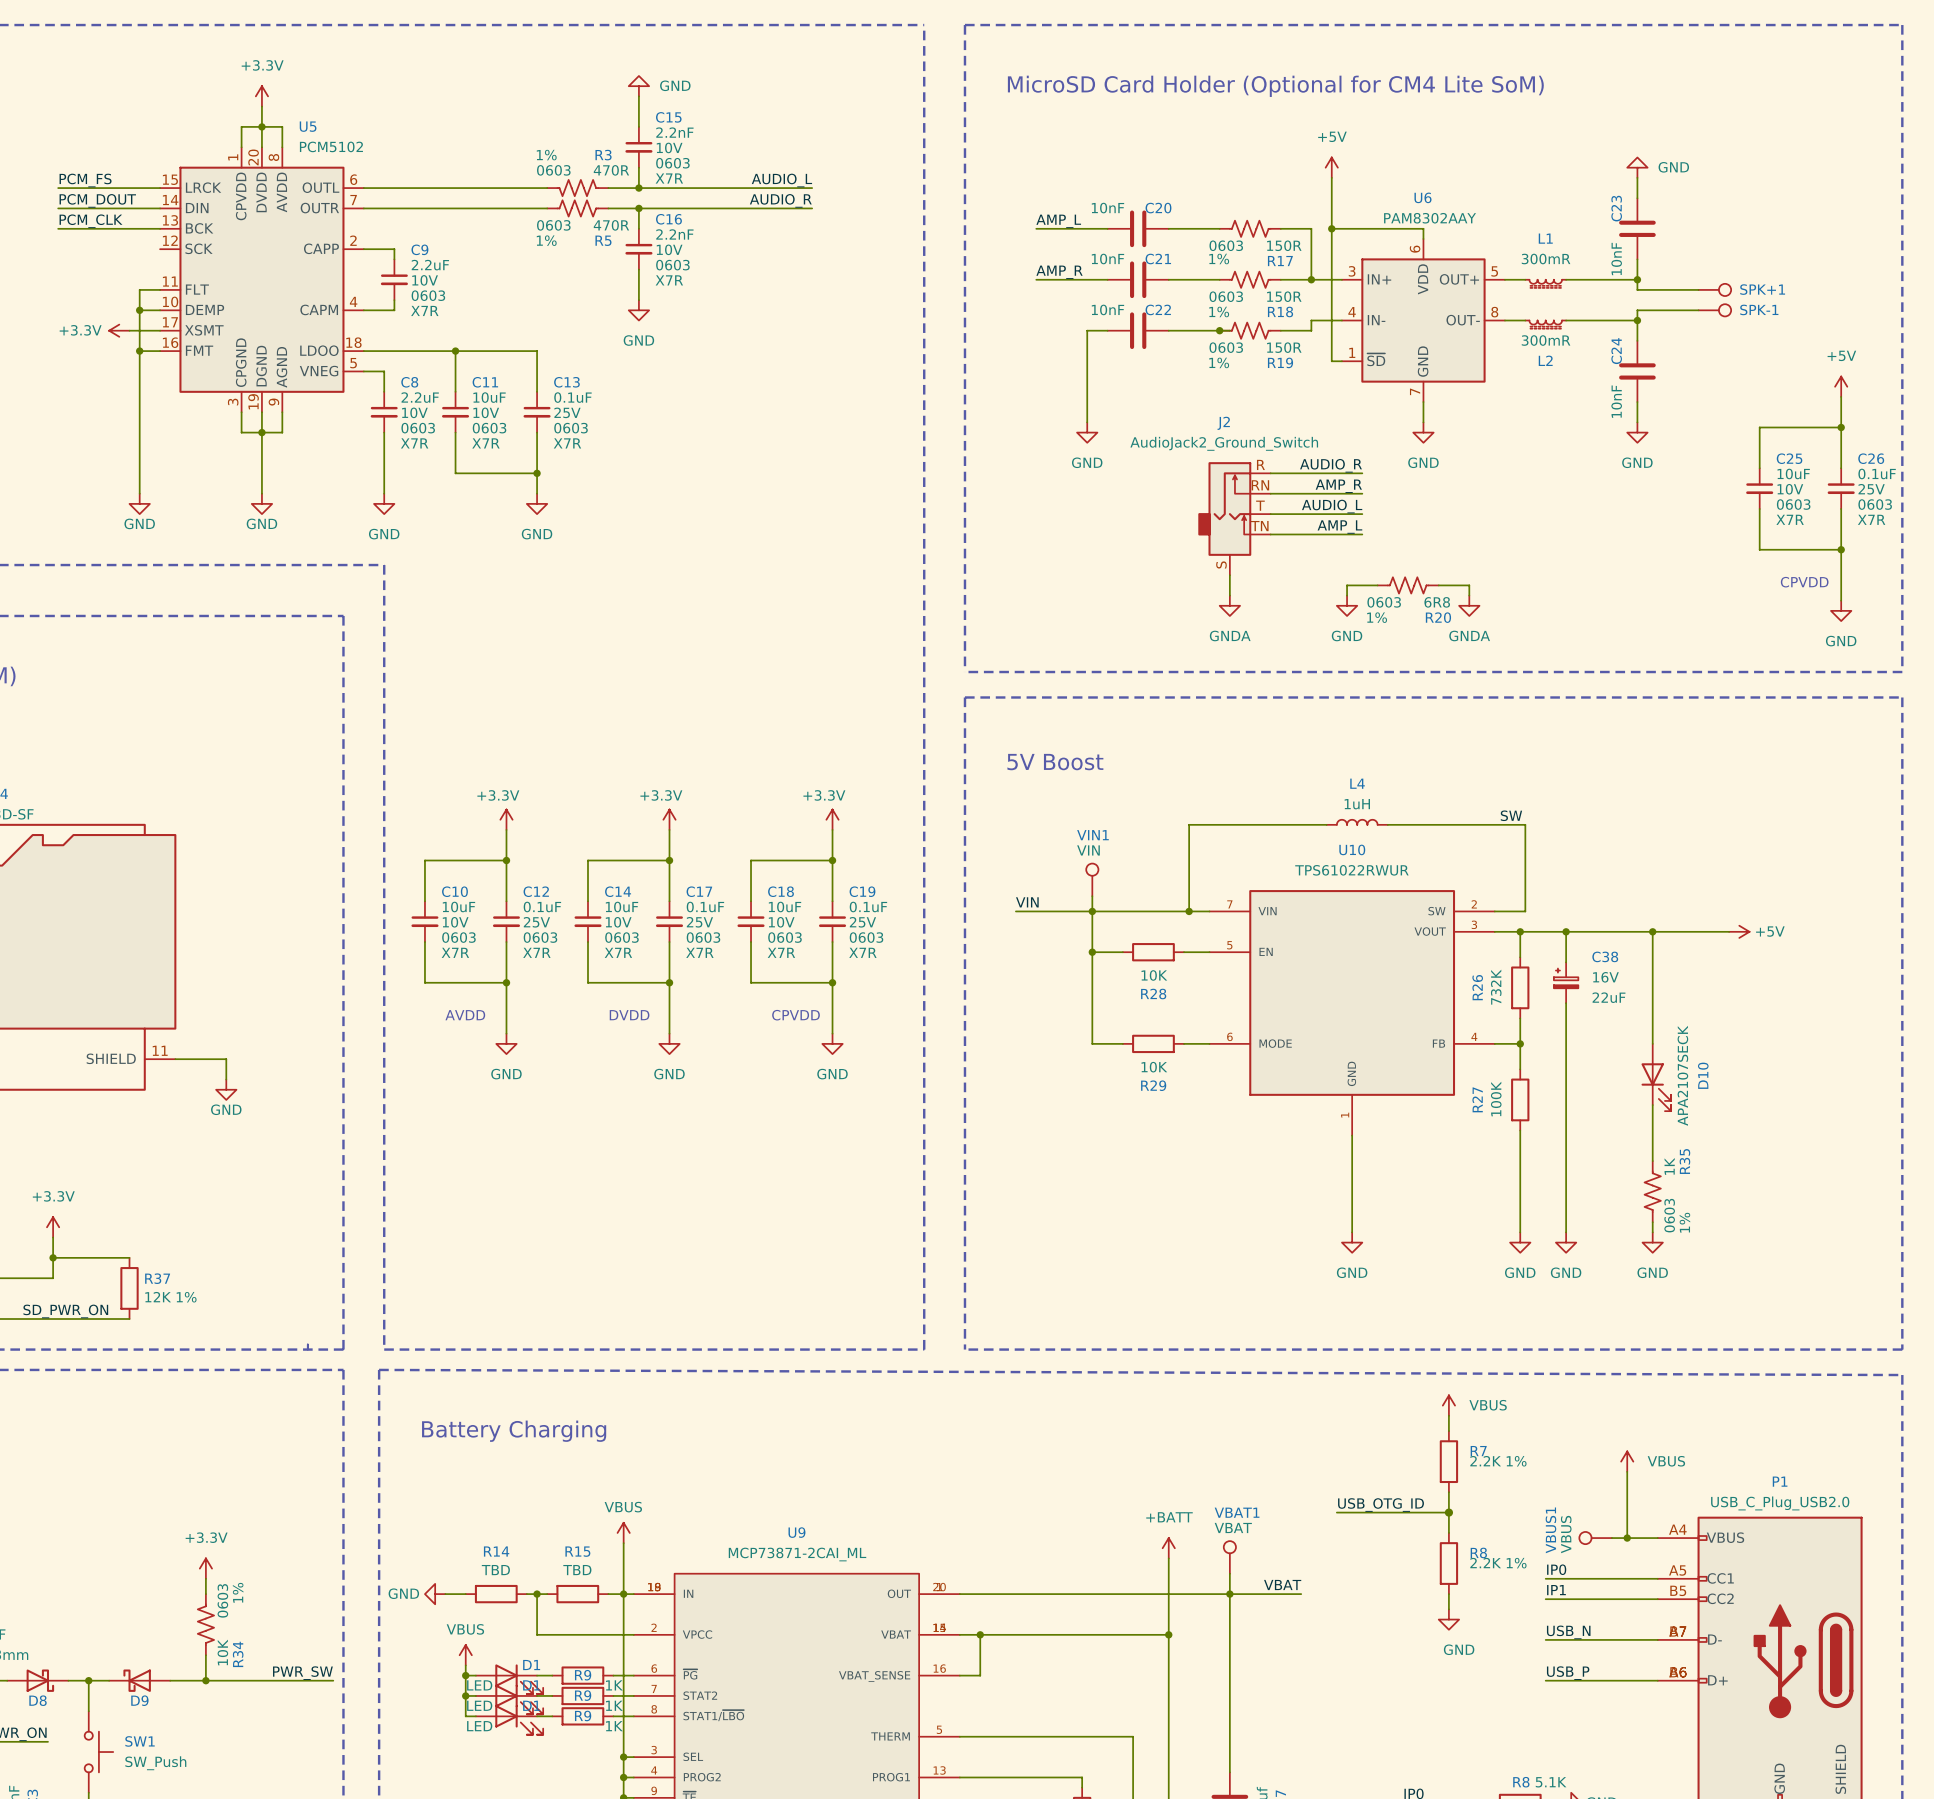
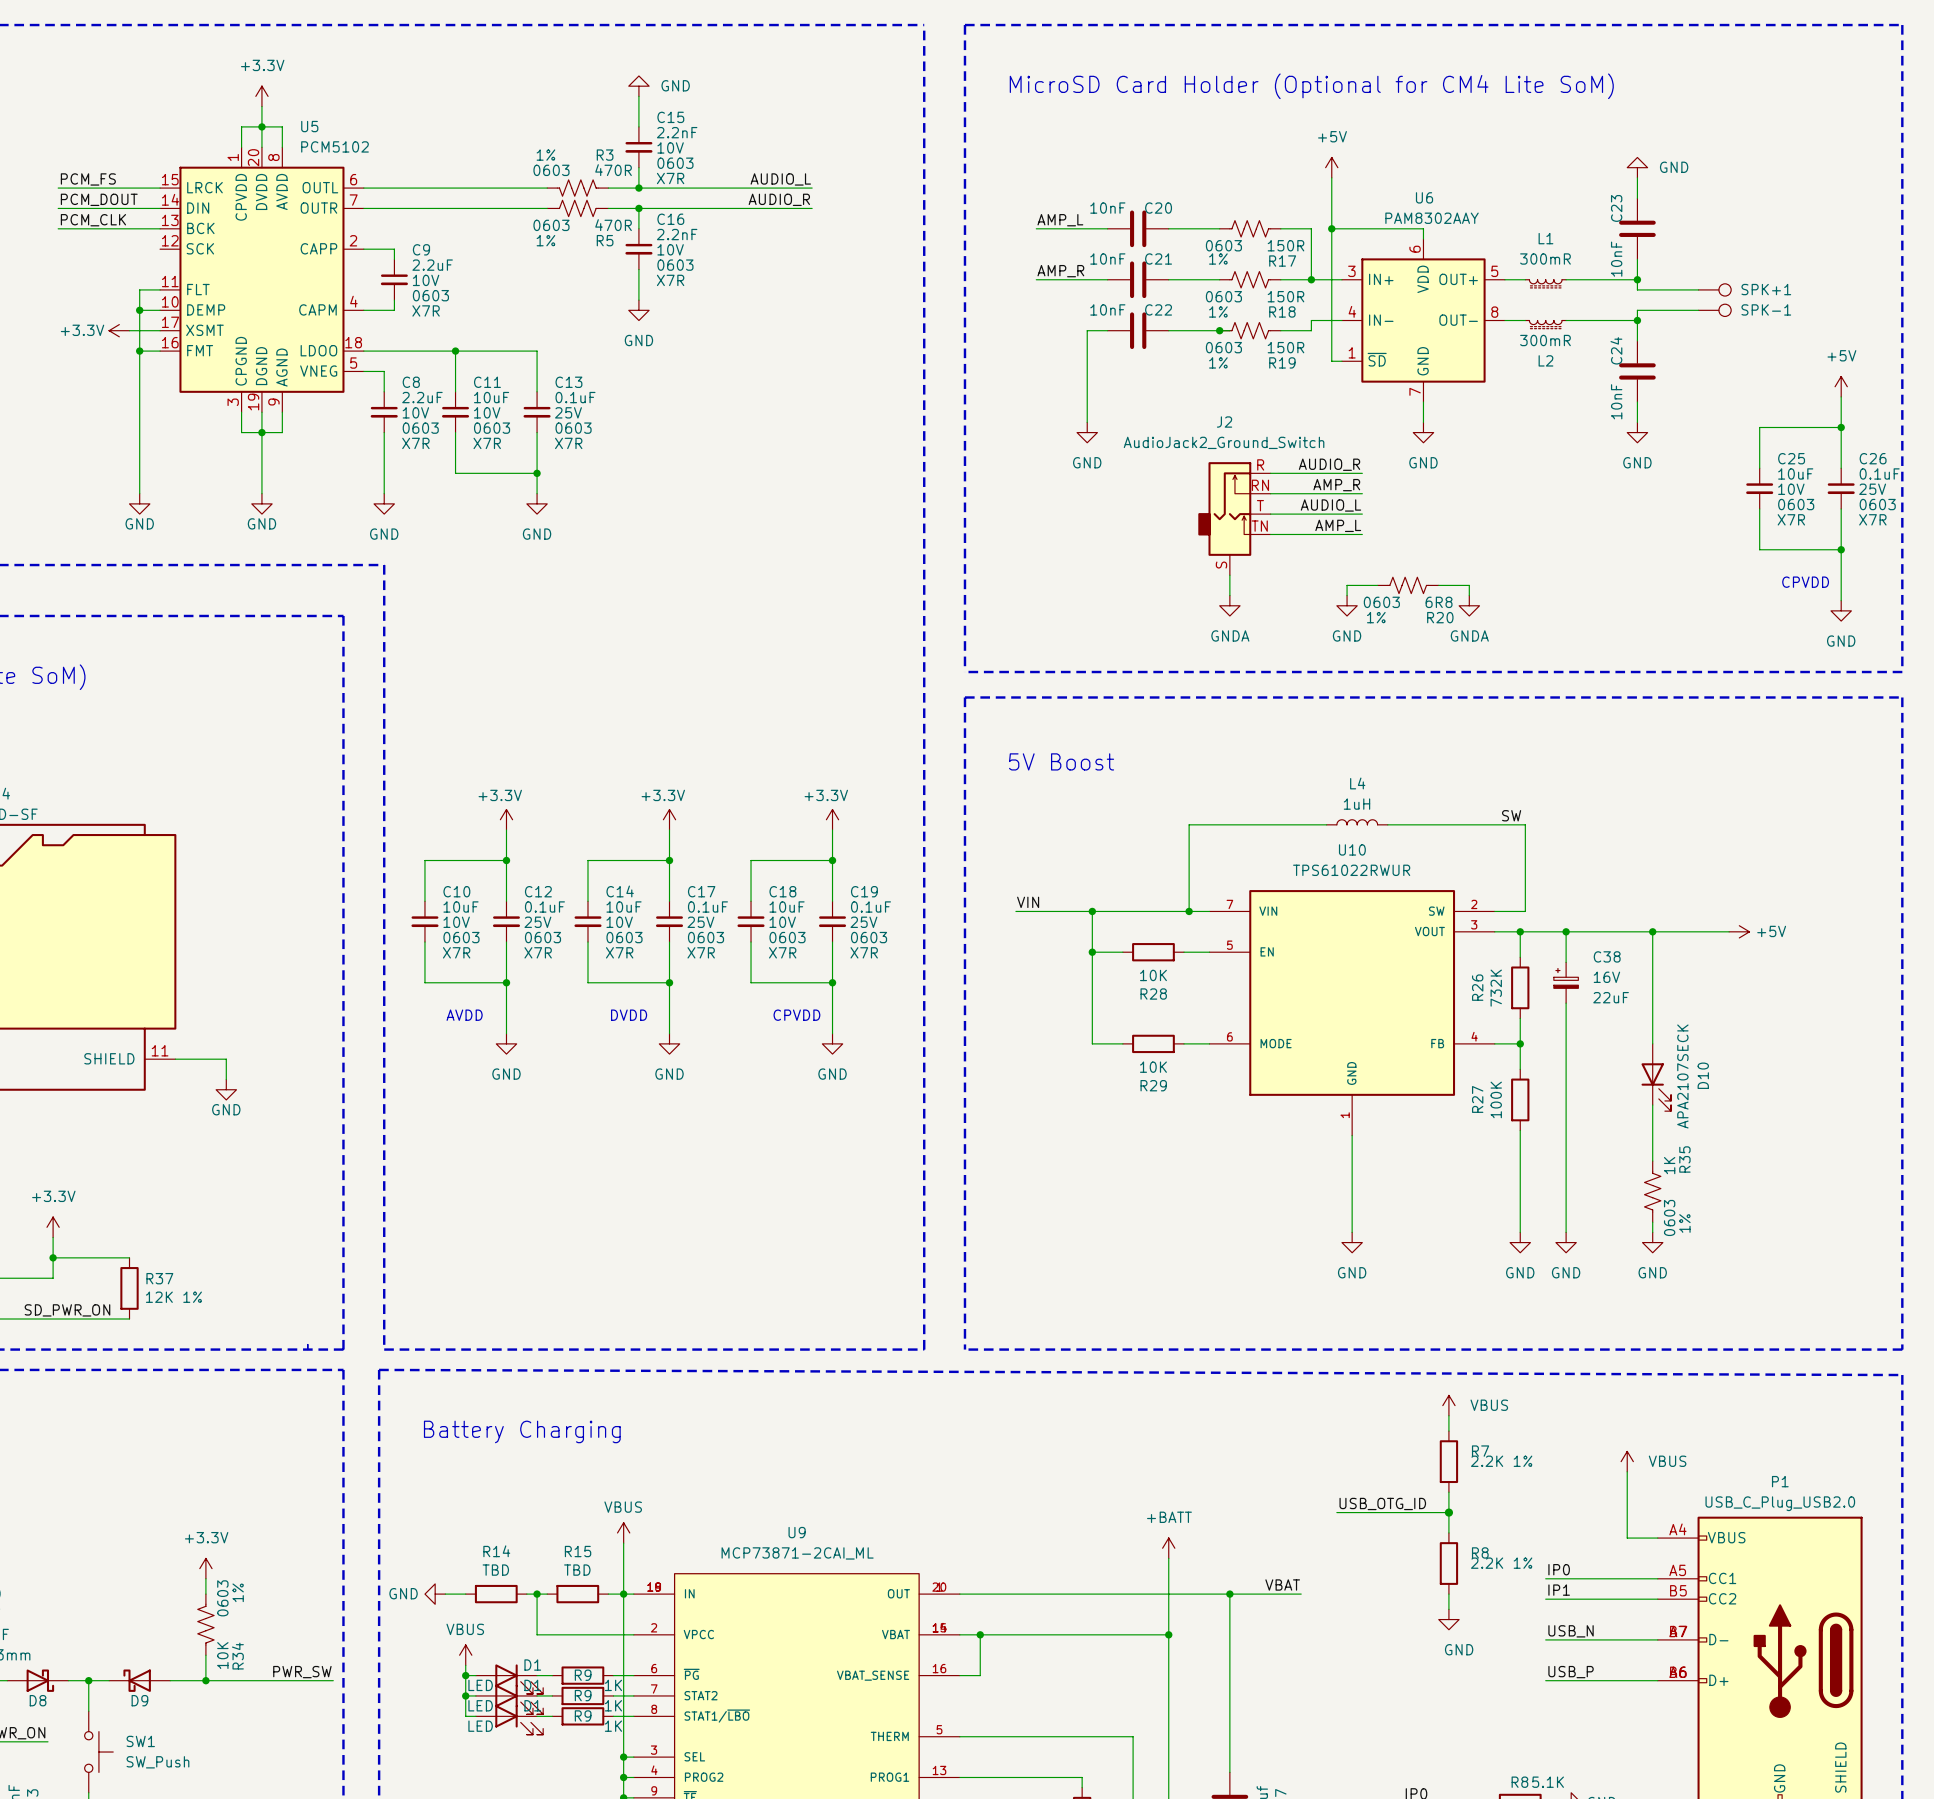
VIN1: VIN (1092, 879) -> none
wire: (1092, 896) (1092, 911) -> none
VBUS1: VBUS (1595, 1538) -> none
wire: (1611, 1538) (1627, 1538) -> none
junction: (1627, 1538) -> none
VBAT1: VBAT (1229, 1557) -> none
wire: (1229, 1573) (1229, 1594) -> none

